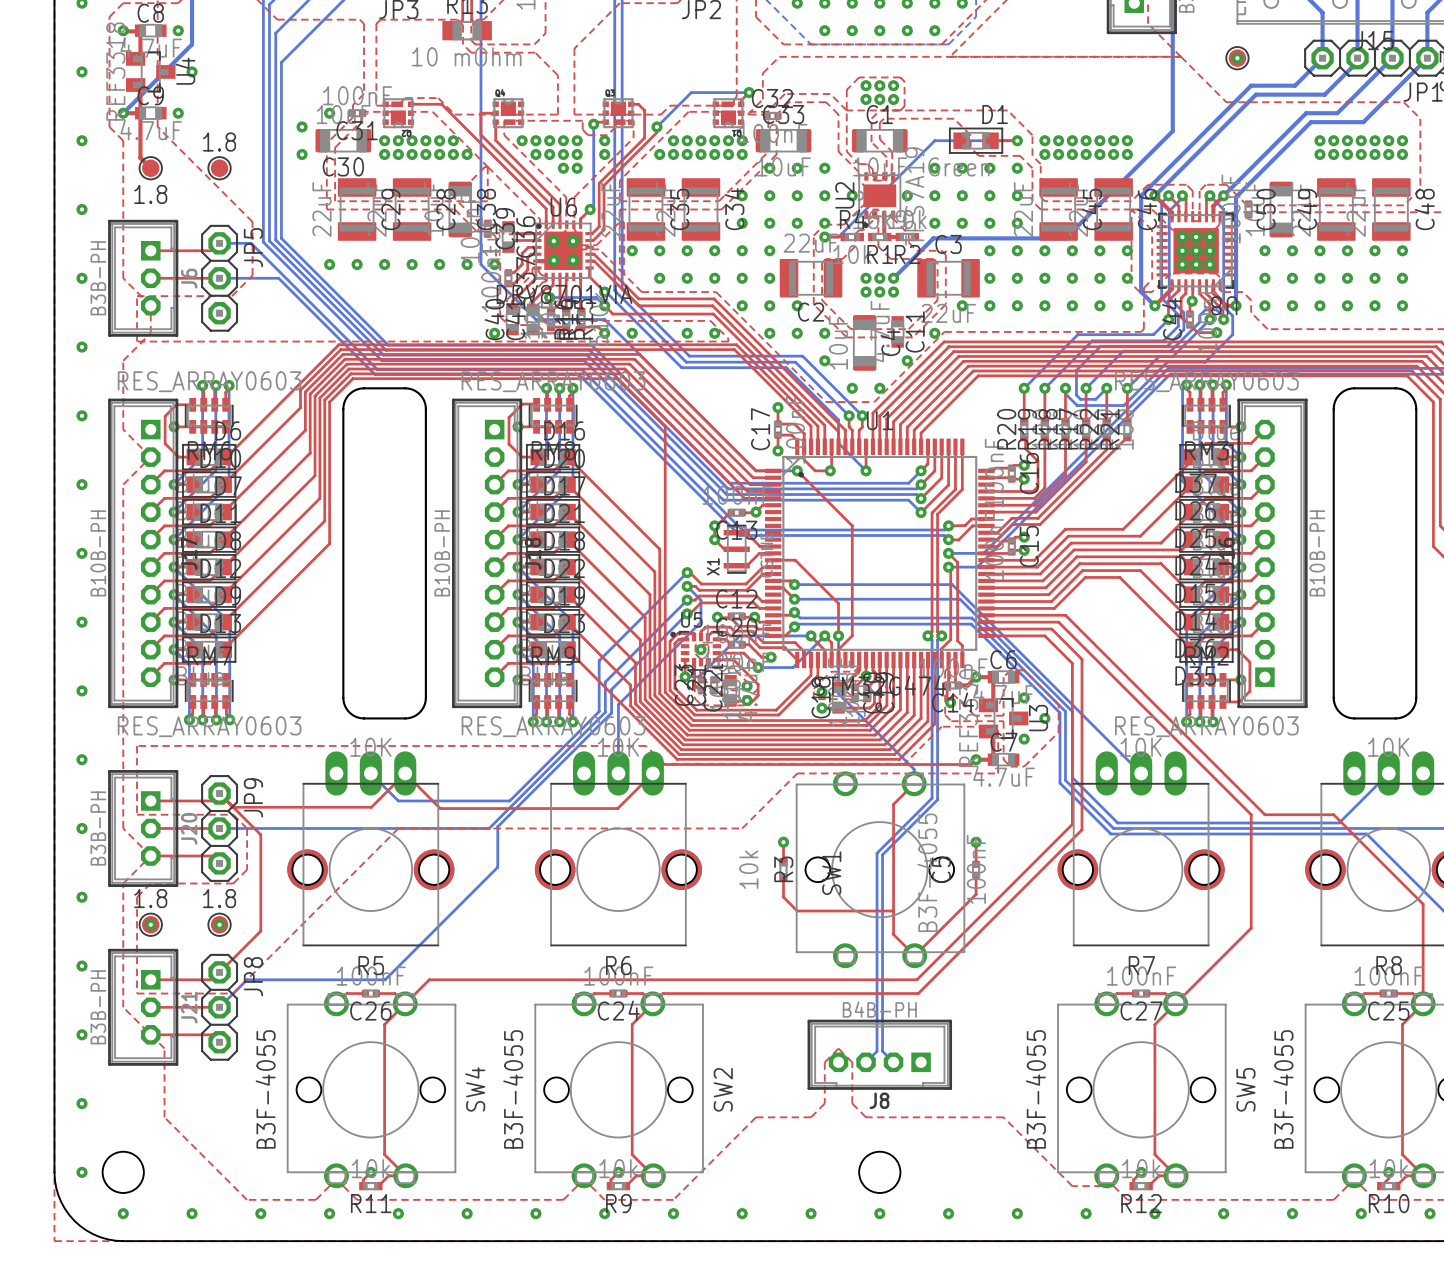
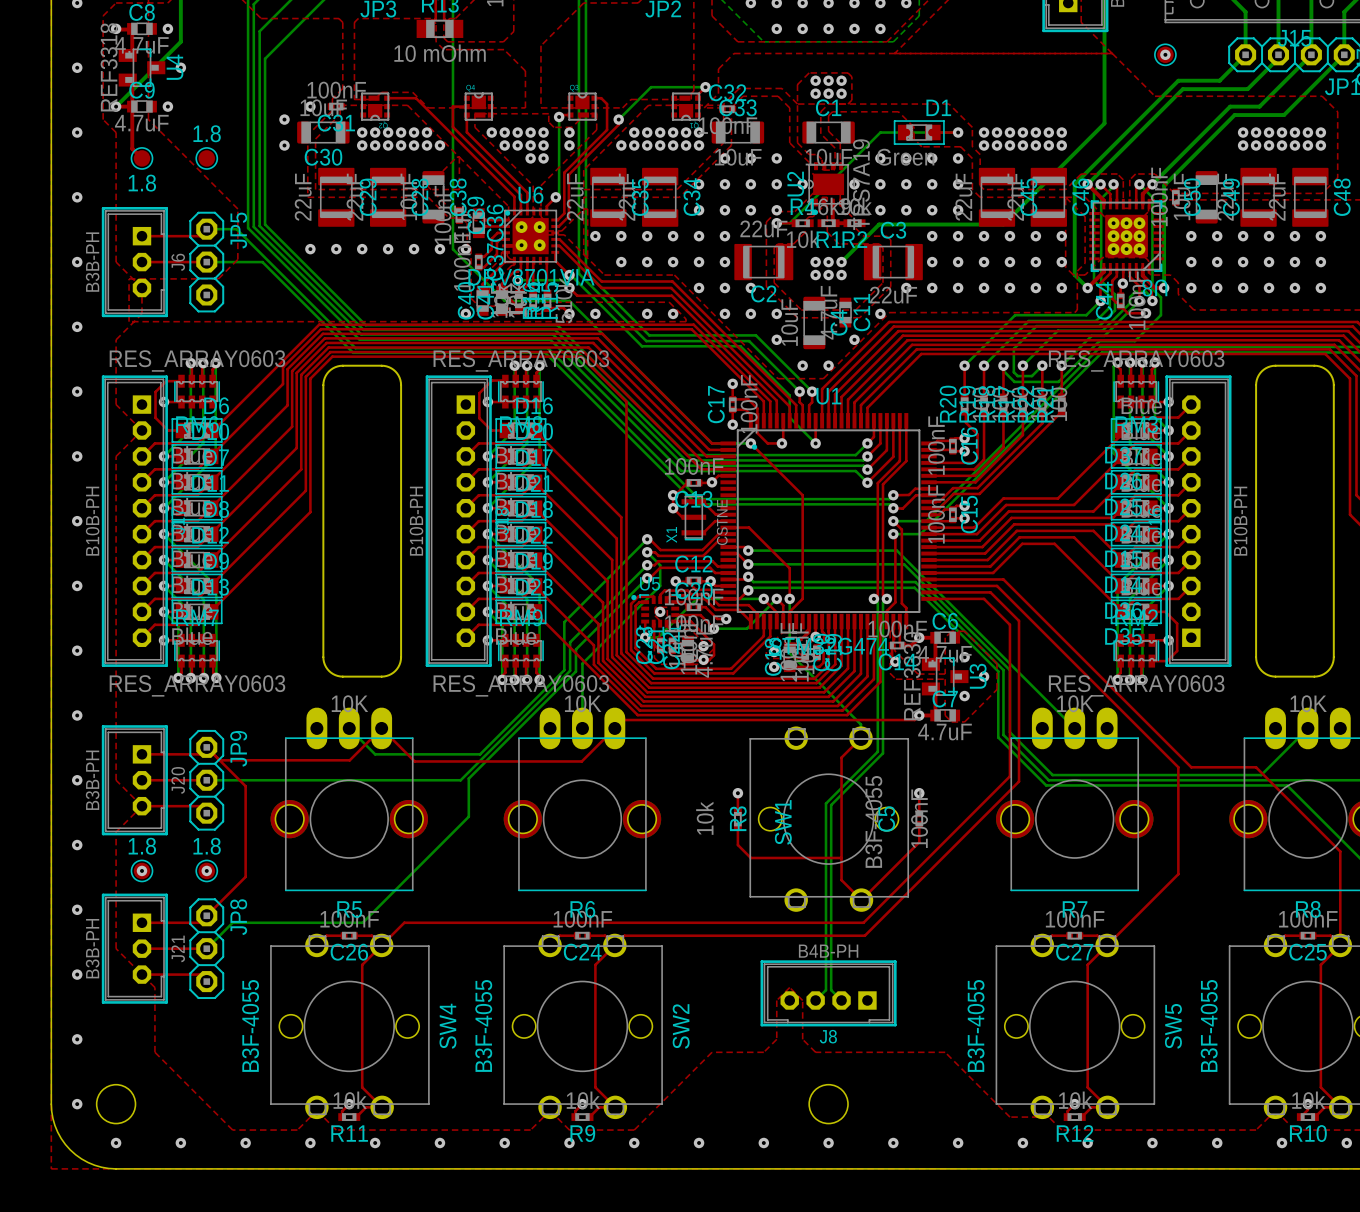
top zone outline: (941, 726) (998, 726) (998, 773) (797, 773) (742, 828) (398, 828) (233, 993) (137, 993) (137, 897) (150, 883) (233, 883) (247, 869) (247, 828) (233, 814) (137, 814) (137, 745) (645, 745) (663, 763) (904, 763) (941, 726) -> none

